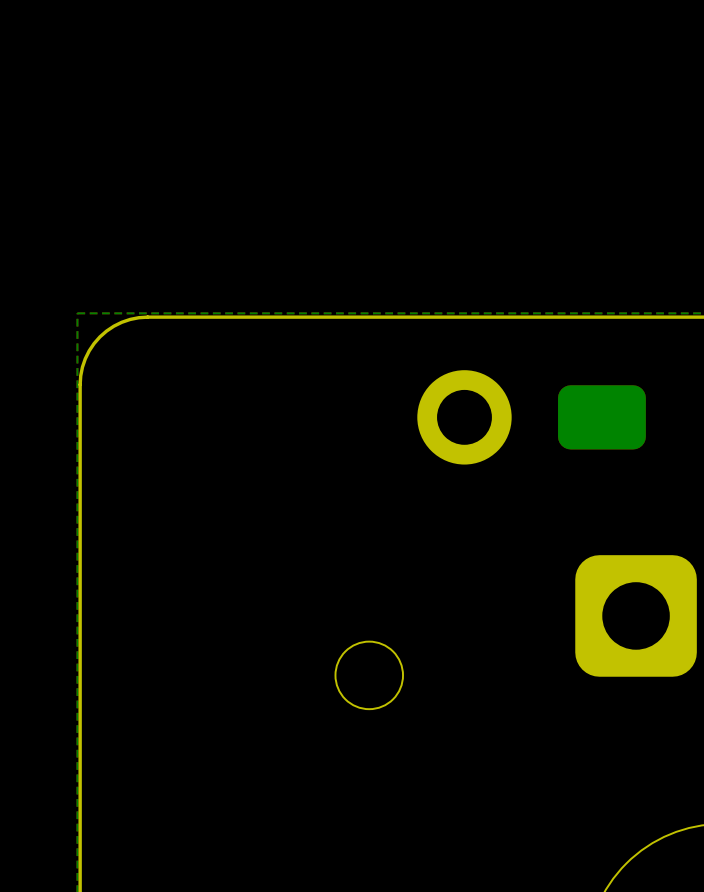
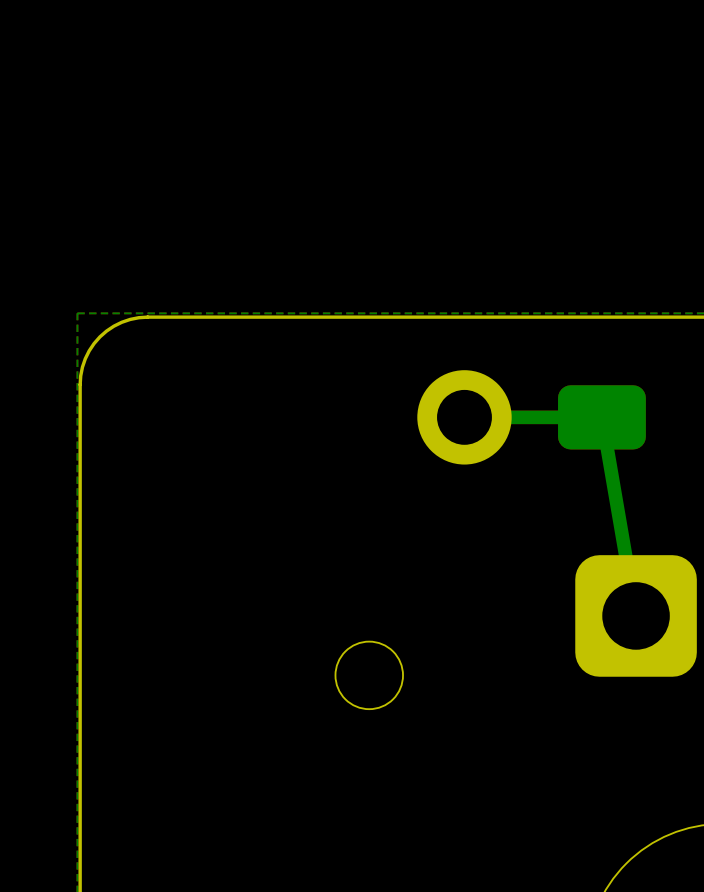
bottom track: none -> (464, 417) (601, 417) (636, 615)

